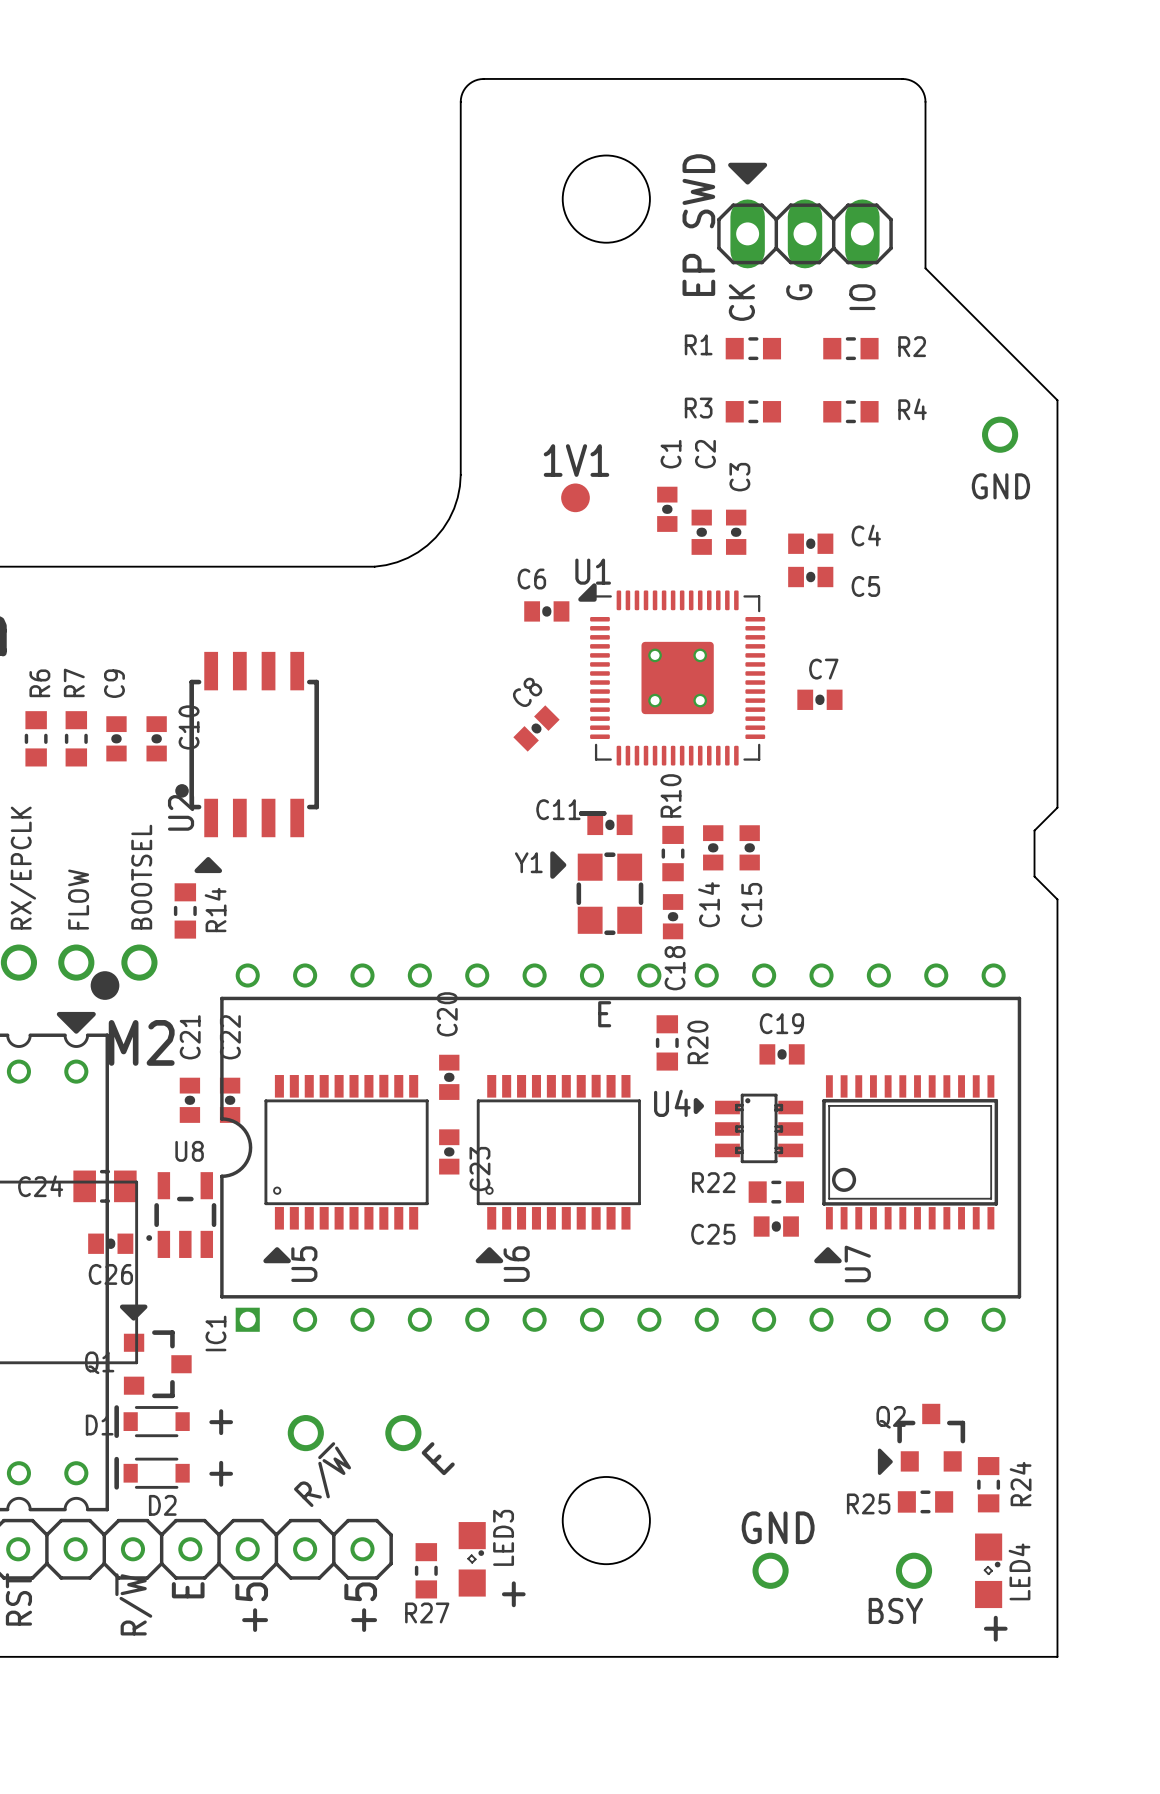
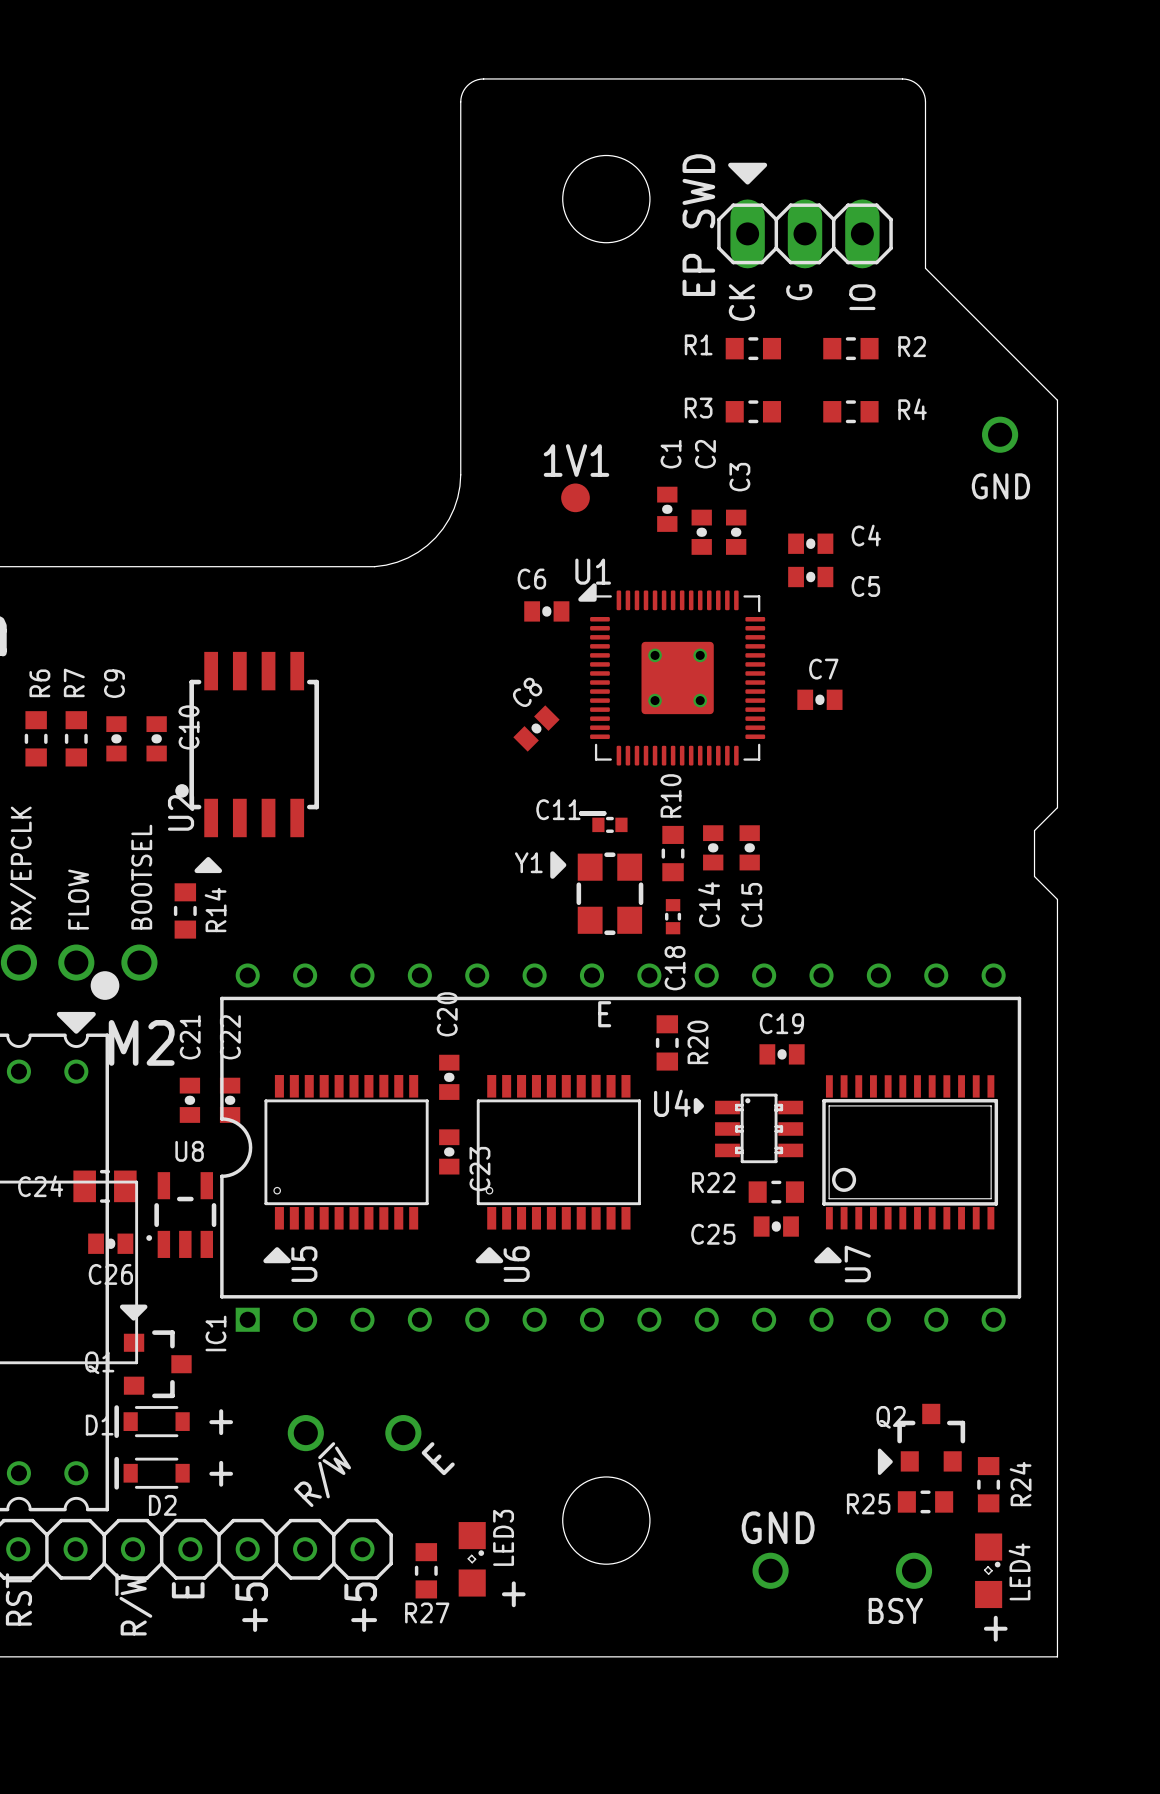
C11 footprint: [587, 814, 633, 836] -> [592, 816, 628, 833]
C18 footprint: [662, 894, 684, 940] -> [664, 899, 682, 935]

